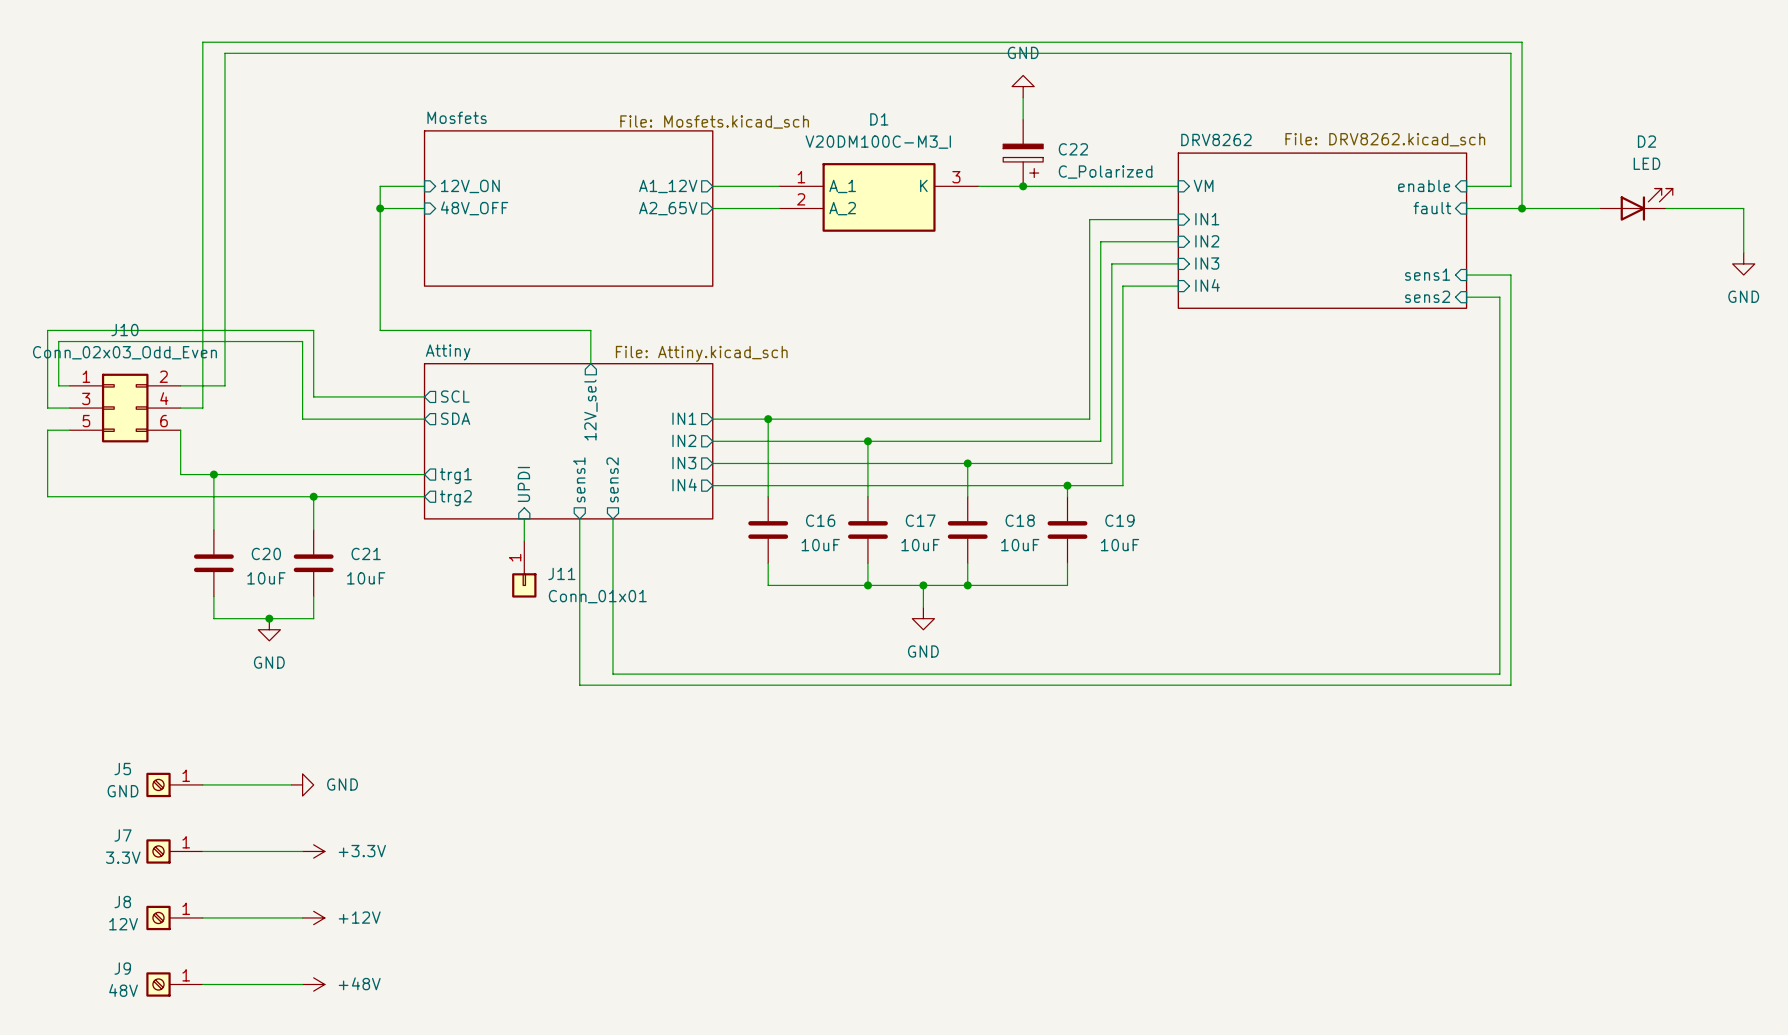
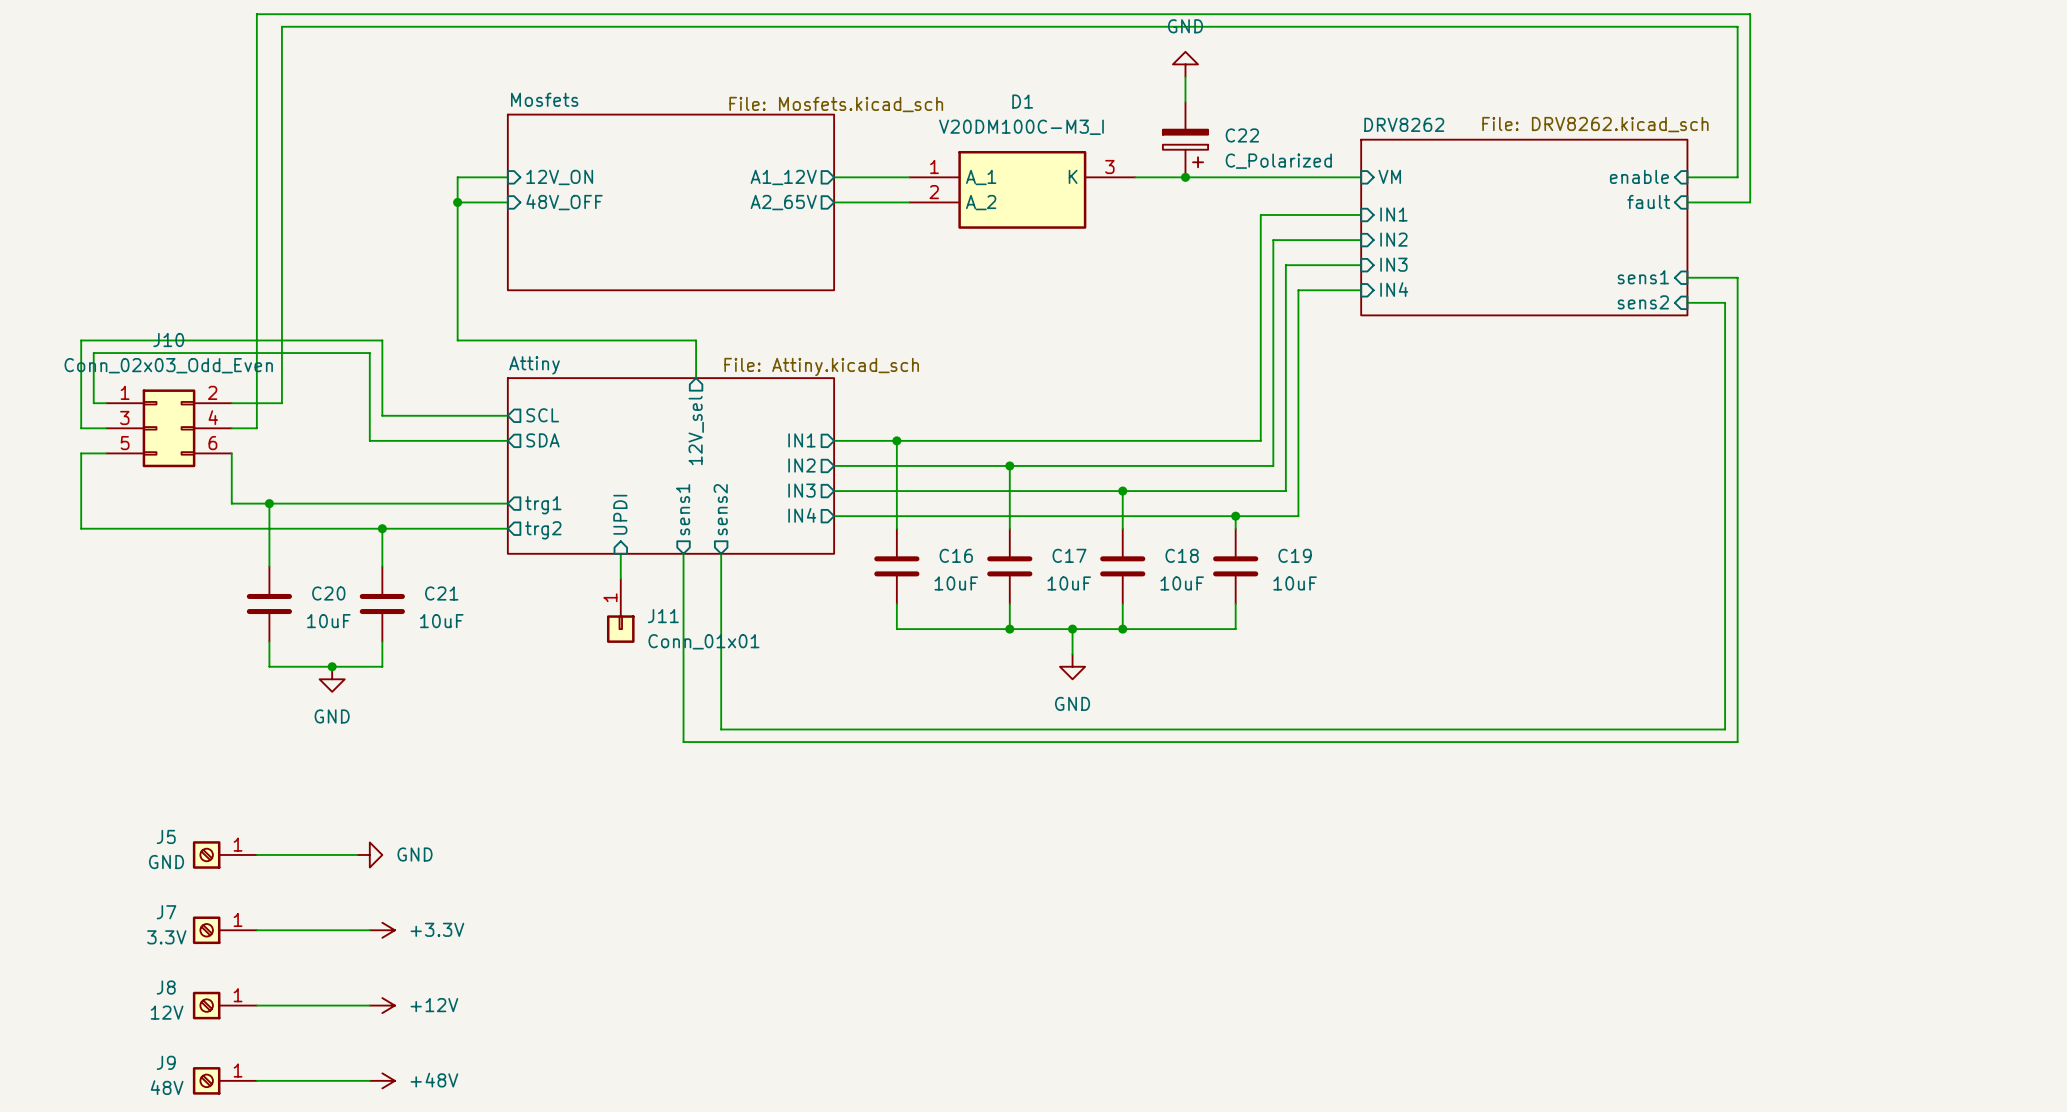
D2: LED (1636, 204) -> none
wire: (1522, 208) (1599, 208) -> none
junction: (1522, 208) -> none
wire: (1666, 208) (1743, 208) (1743, 252) -> none
power symbol: GND (1743, 263) -> none

